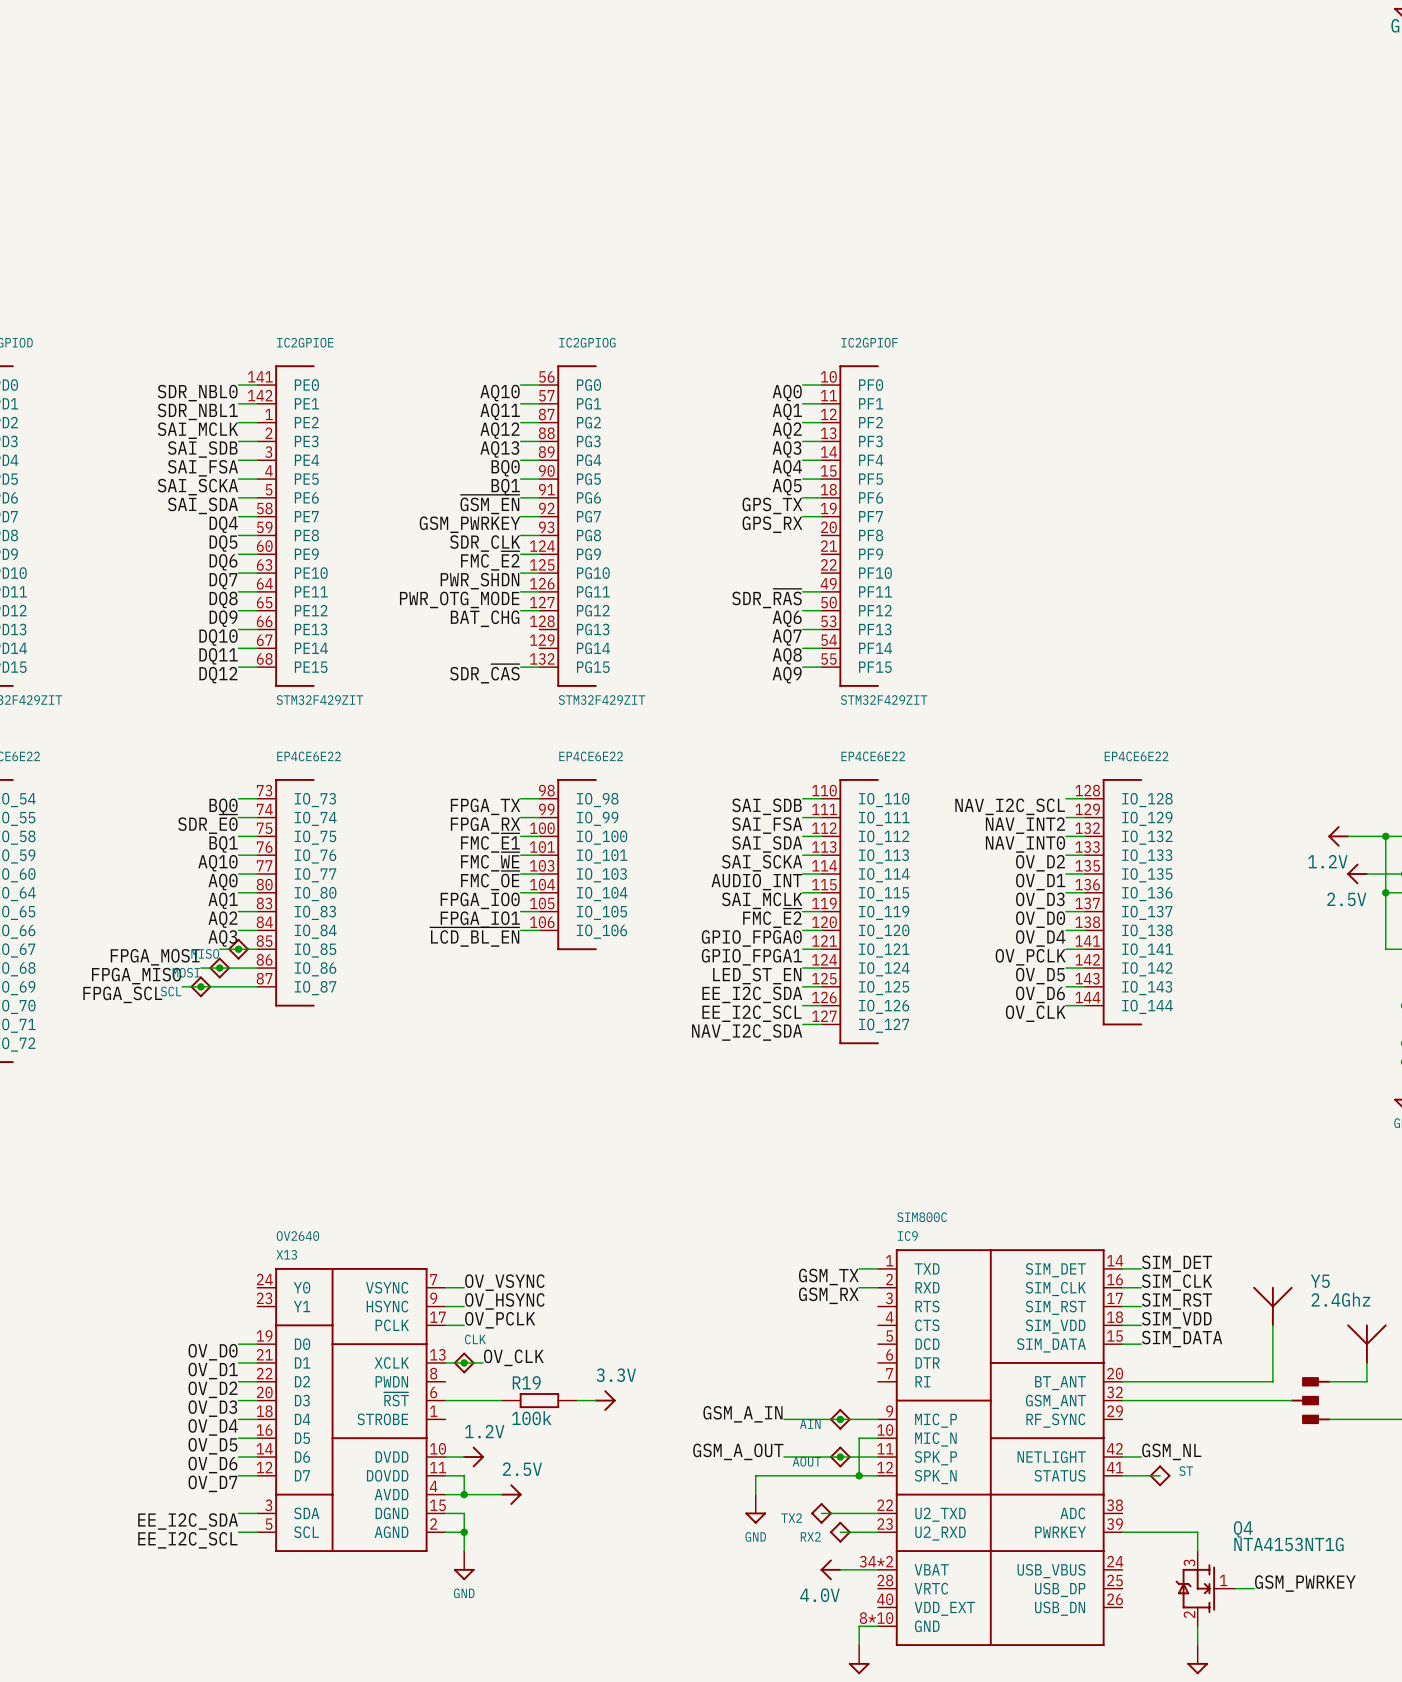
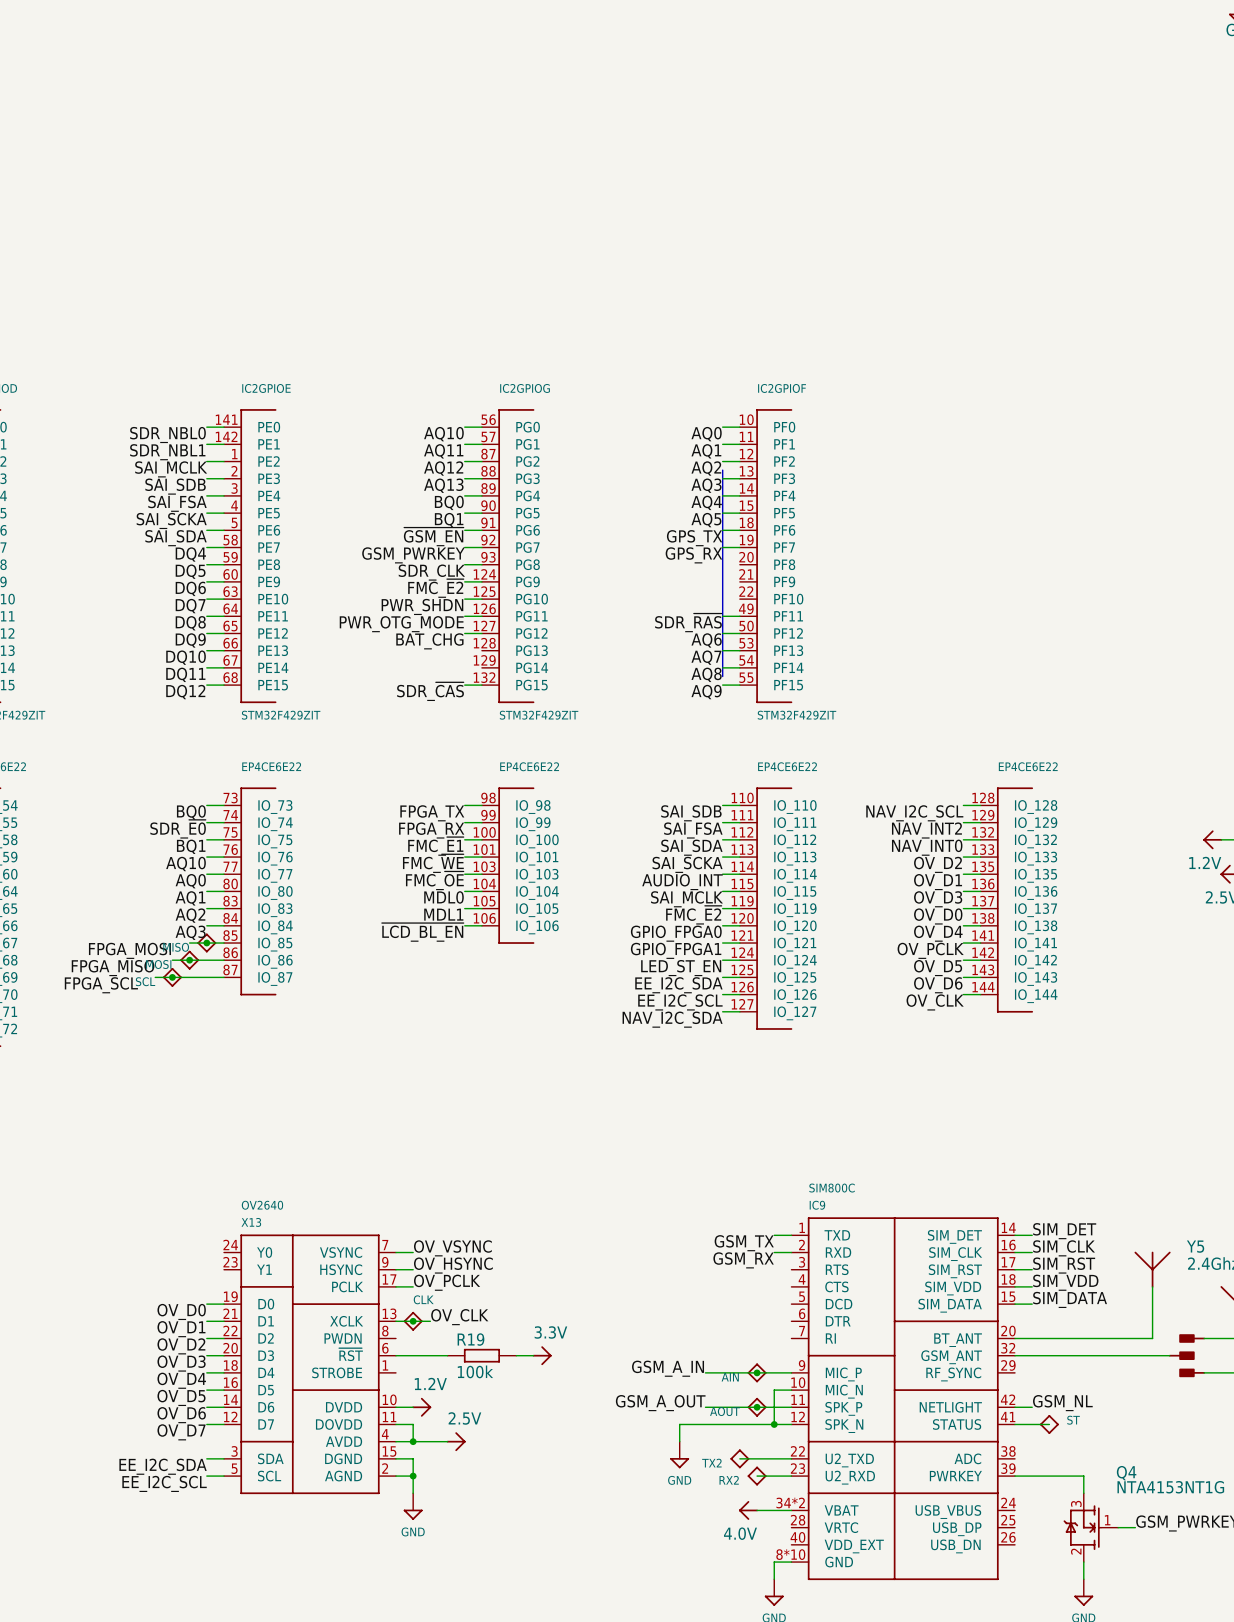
bus: none -> (722, 470) (722, 676)
label: FPGA_IO0 (480, 900) -> MDL0 (443, 897)
label: FPGA_IO1 (480, 919) -> MDL1 (443, 914)

